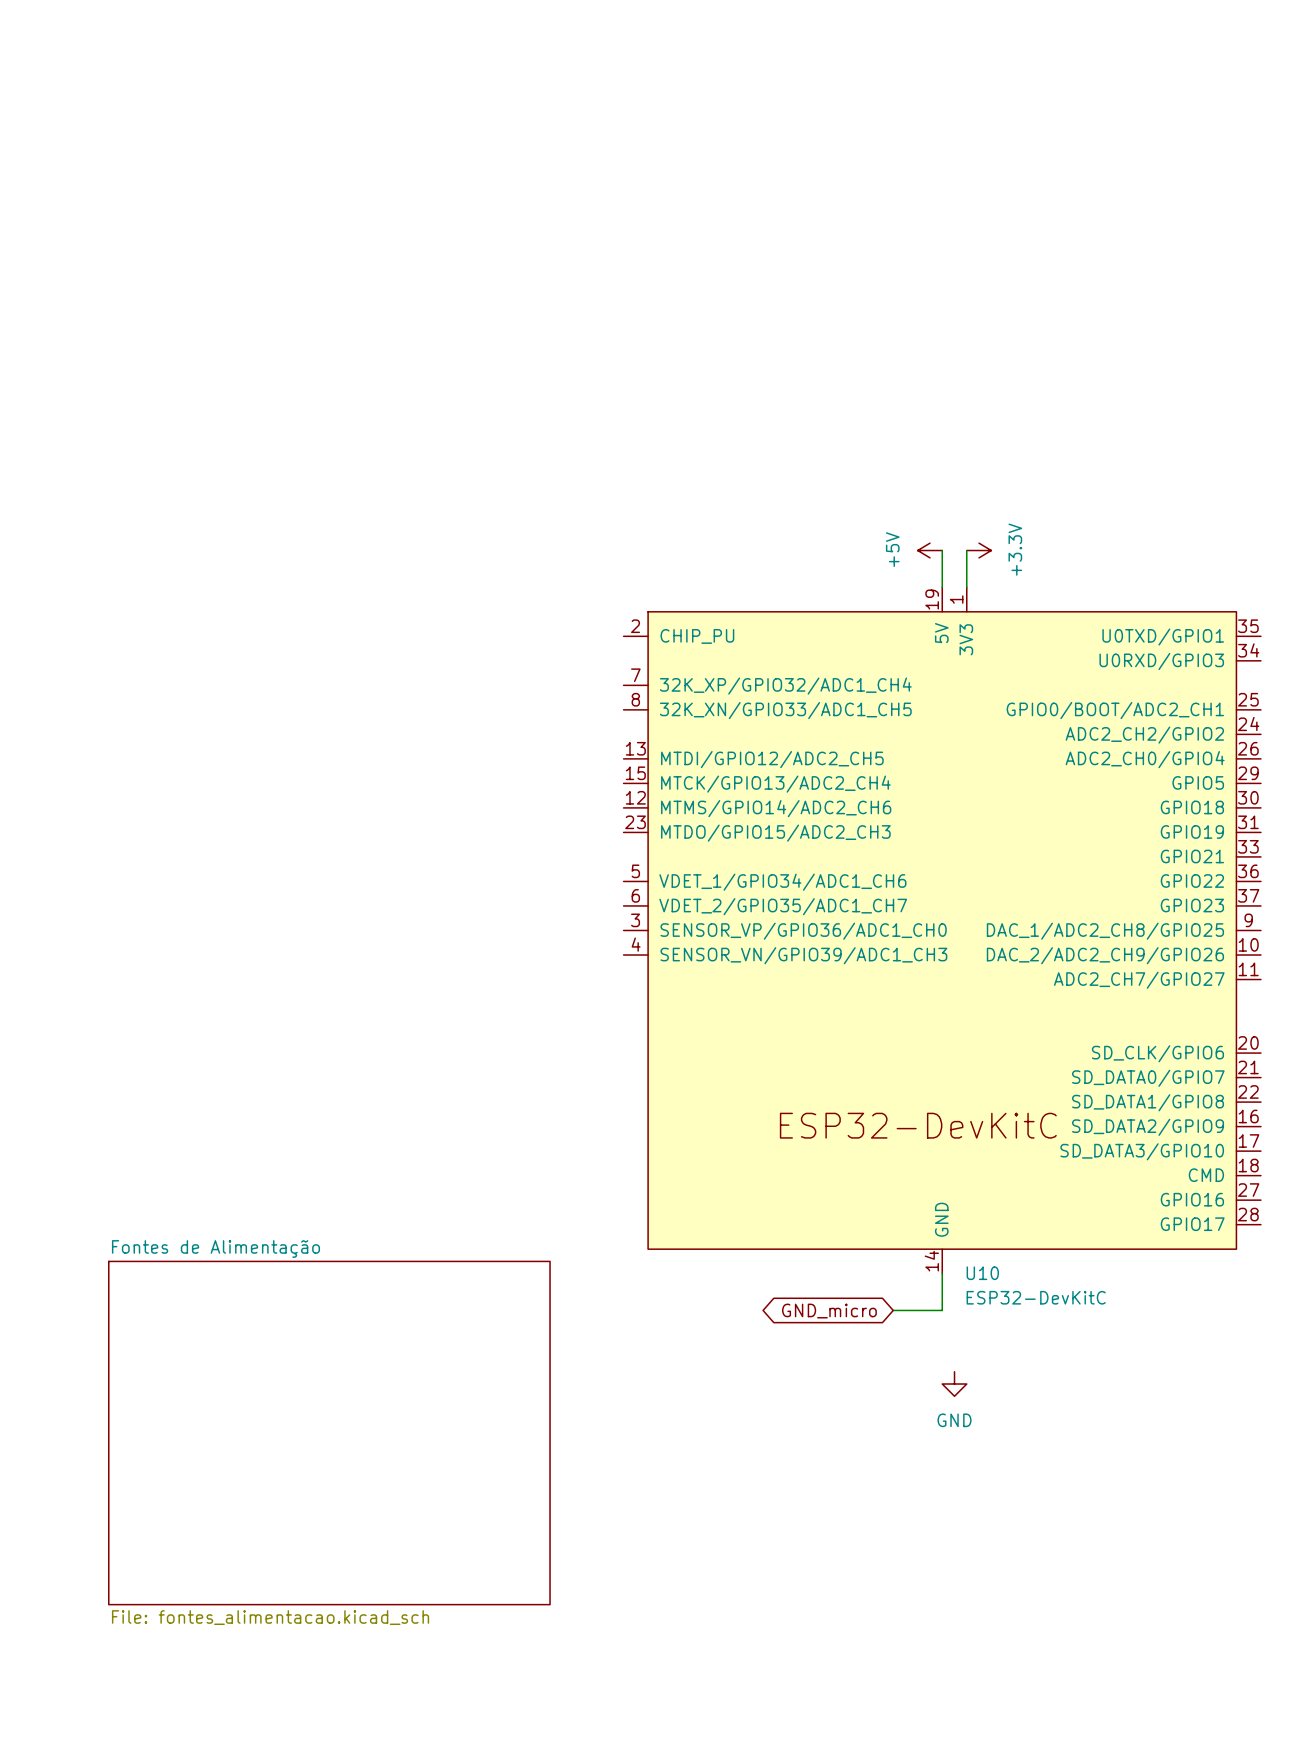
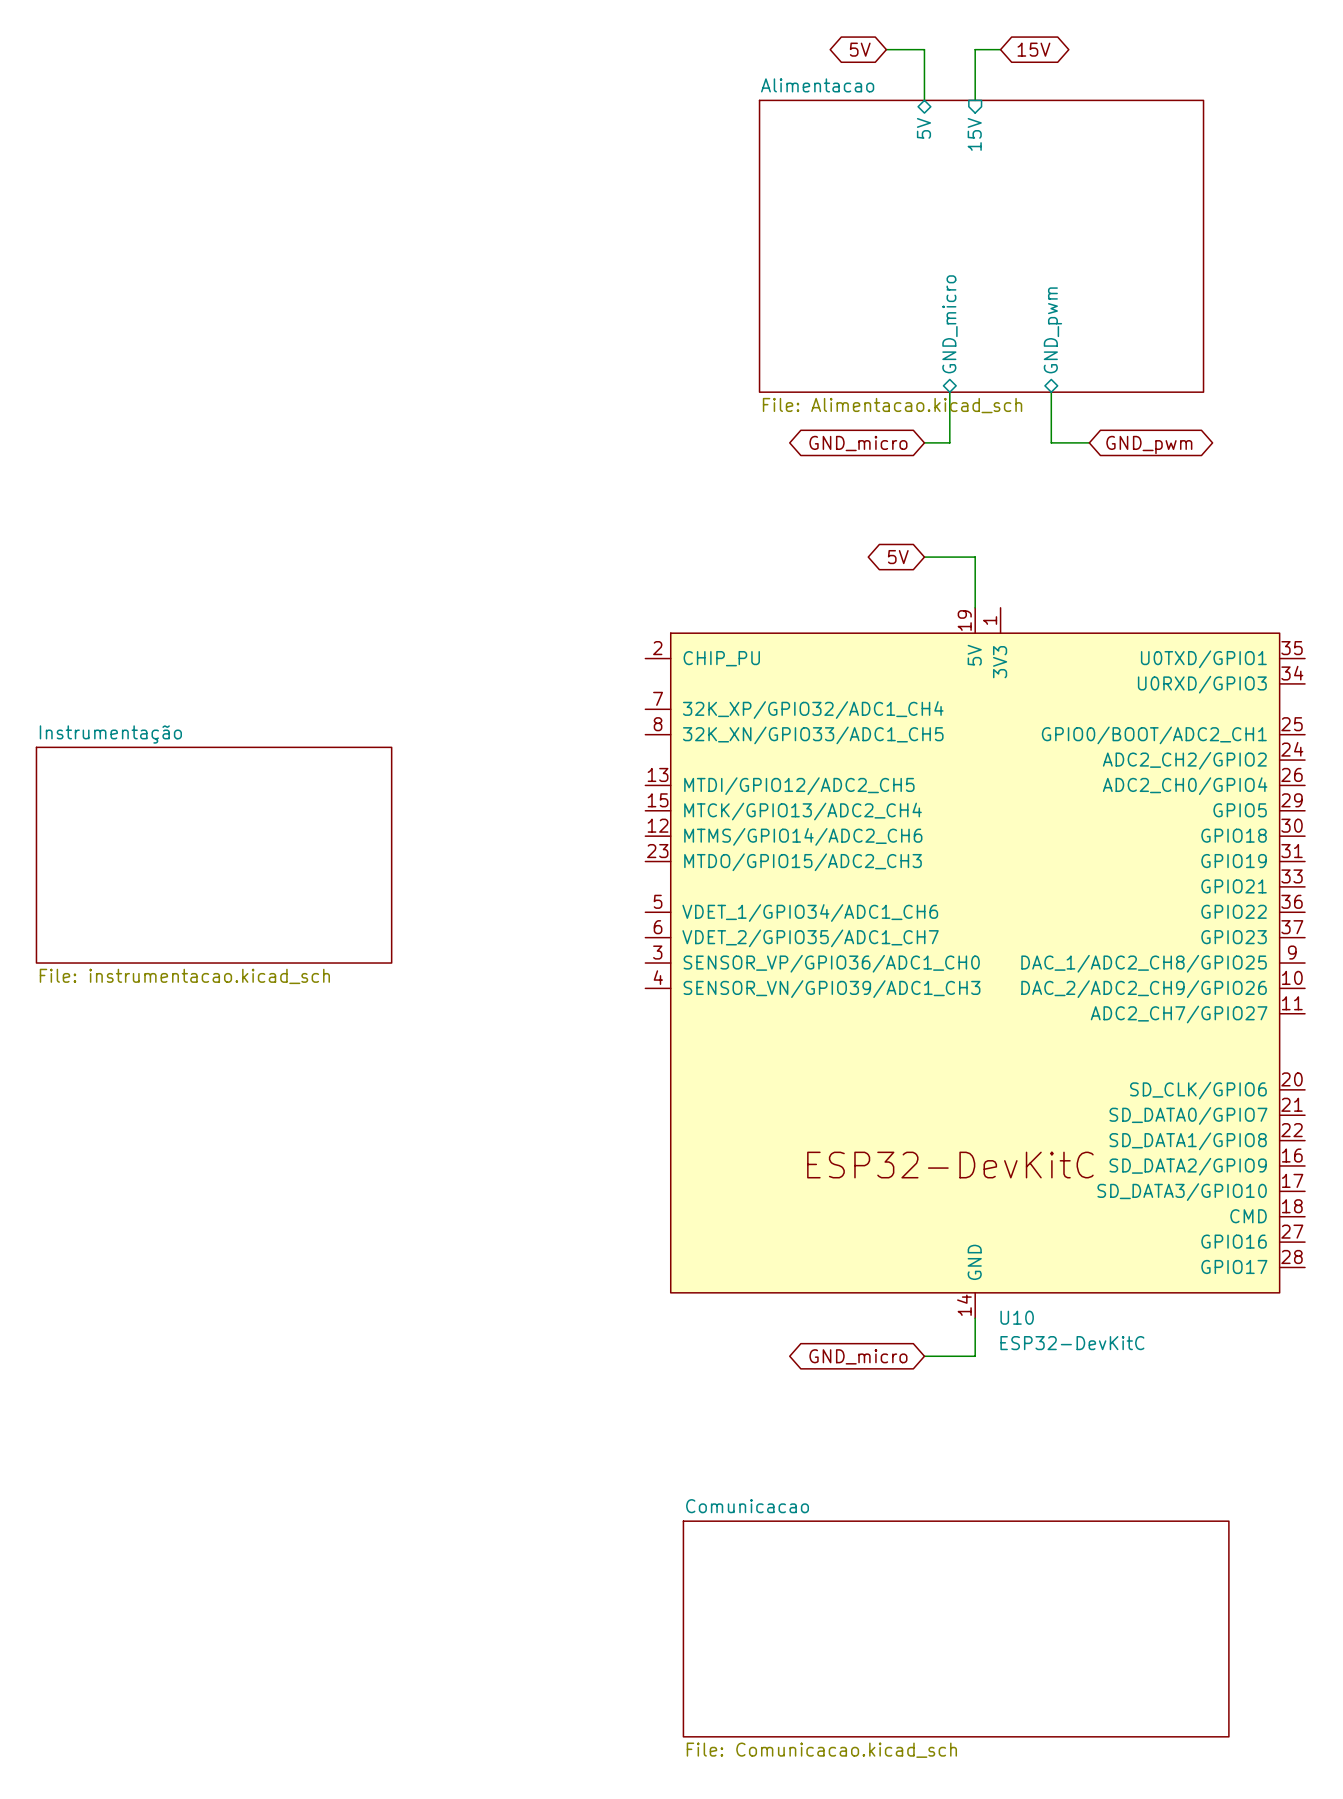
global label: none -> 5V (860, 49)
wire: none -> (886, 49) (924, 49) (924, 100)
wire: none -> (1000, 49) (975, 49) (975, 100)
global label: none -> 15V (1033, 49)
sheet pin: none -> 5V (923, 128)
sheet pin: none -> 15V (974, 134)
sheet Alimentacao: none -> File: Alimentacao.kicad_sch (981, 246)
sheet pin: none -> GND_micro (949, 324)
sheet pin: none -> GND_pwm (1052, 330)
wire: none -> (949, 392) (949, 442) (924, 442)
wire: none -> (1051, 392) (1051, 442) (1089, 442)
global label: none -> GND_micro (858, 443)
global label: none -> GND_pwm (1149, 445)
global label: none -> 5V (898, 557)
wire: none -> (924, 557) (975, 557) (975, 569)
power symbol: +5V (930, 550) -> none
wire: (966, 550) (966, 587) -> none
power symbol: +3.3V (979, 550) -> none
sheet Instrumentação: none -> File: instrumentacao.kicad_sch (214, 855)
power symbol: GND (954, 1384) -> none
sheet Fontes de Alimentação: File: fontes_alimentacao.kicad_sch (329, 1433) -> none
sheet Comunicacao: none -> File: Comunicacao.kicad_sch (956, 1629)

